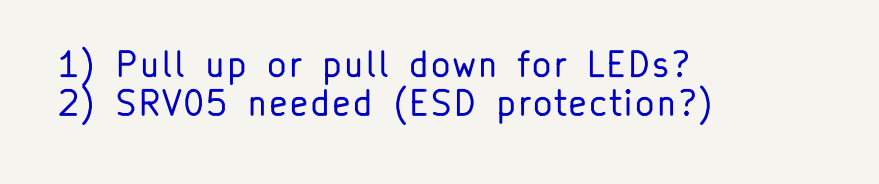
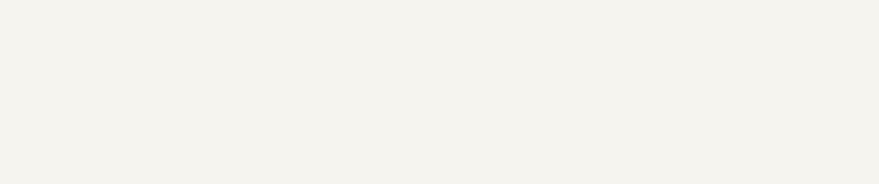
text: 1) Pull up or pull down for LEDs? (374, 66) -> none
text: 2) SRV05 needed (ESD protection?) (384, 105) -> none

